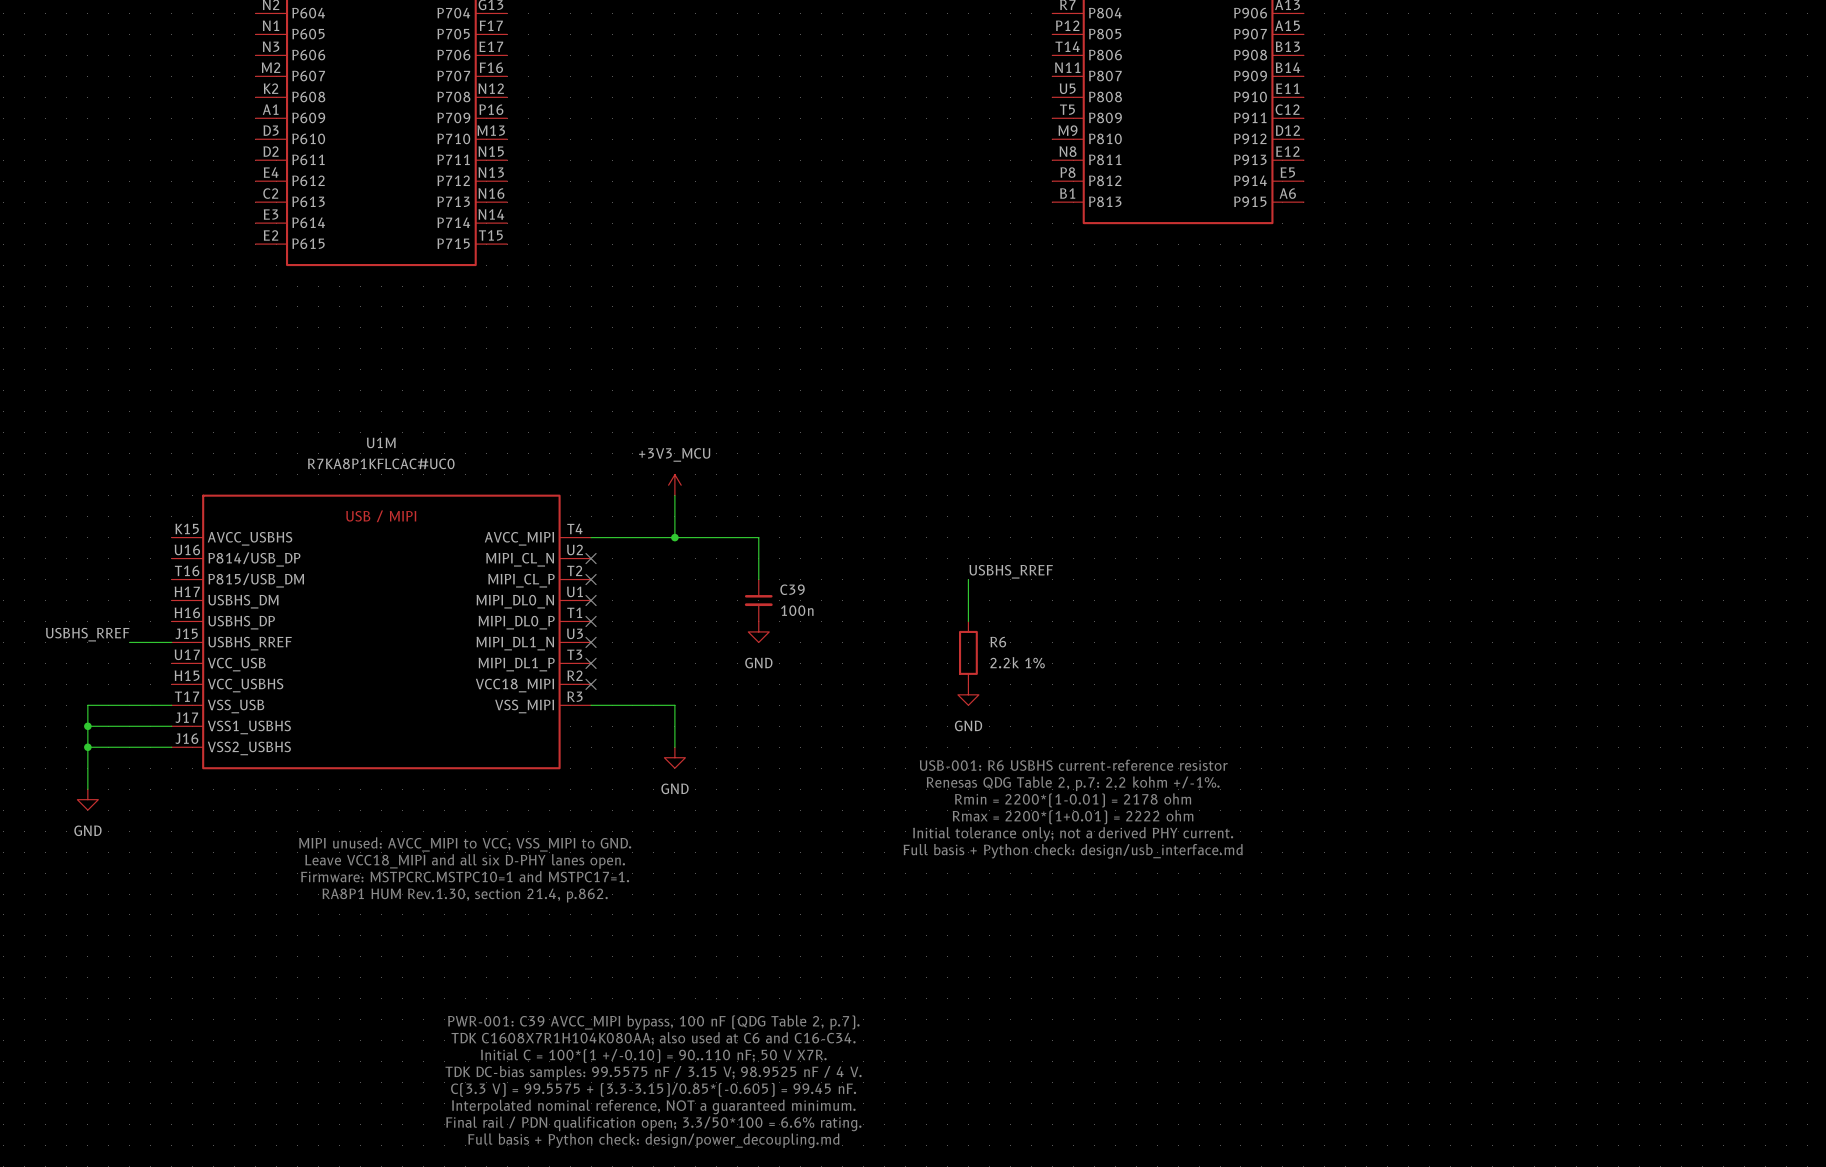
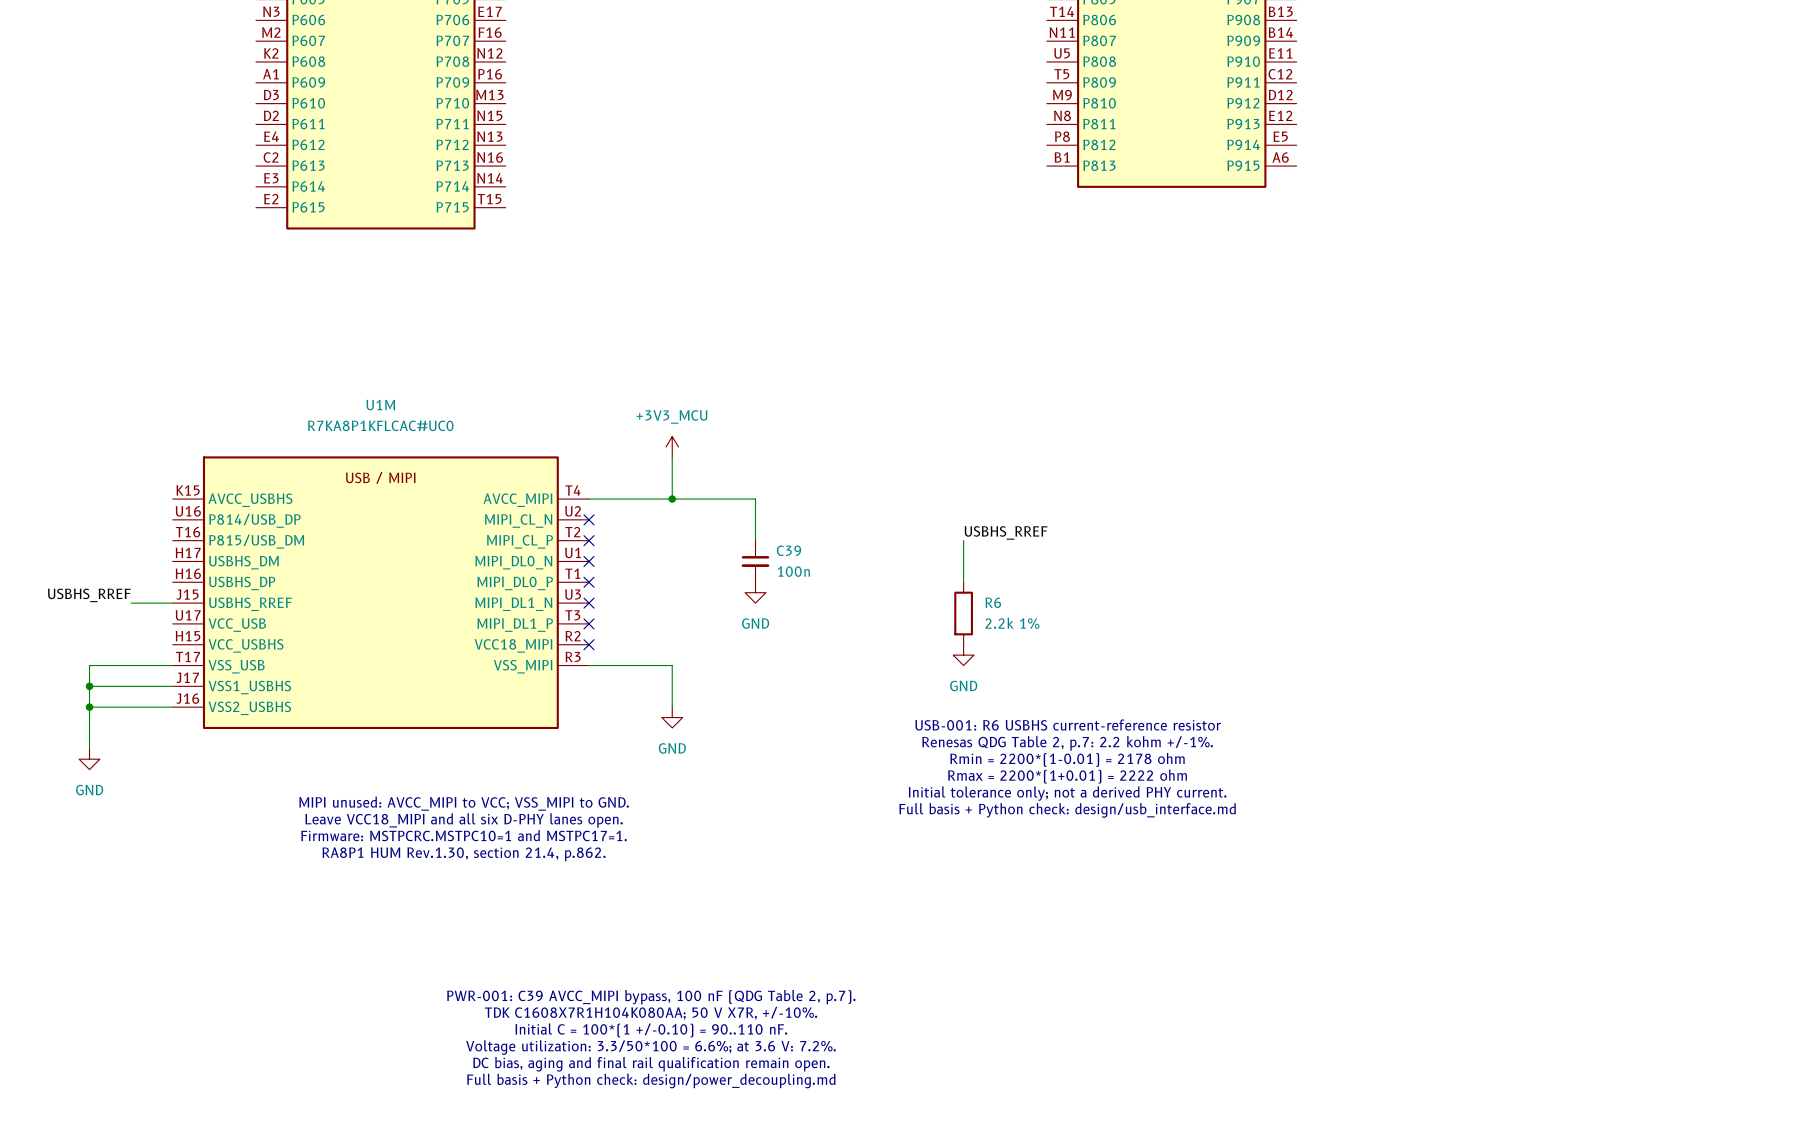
text: PWR-001: C39 AVCC_MIPI bypass, 100 nF (QDG Table 2, p.7). (653, 1022) -> none
text: TDK C1608X7R1H104K080AA; also used at C6 and C16-C34. (653, 1038) -> PWR-001: C39 AVCC_MIPI bypass, 100 nF (QDG Table 2, p.7). (651, 997)
text: Initial C = 100*(1 +/-0.10) = 90..110 nF; 50 V X7R. (653, 1056) -> TDK C1608X7R1H104K080AA; 50 V X7R, +/-10%. (651, 1013)
text: TDK DC-bias samples: 99.5575 nF / 3.15 V; 98.9525 nF / 4 V. (653, 1073) -> Initial C = 100*(1 +/-0.10) = 90..110 nF. (651, 1030)
text: C(3.3 V) = 99.5575 + (3.3-3.15)/0.85*(-0.605) = 99.45 nF. (653, 1089) -> Voltage utilization: 3.3/50*100 = 6.6%; at 3.6 V: 7.2%. (651, 1047)
text: Interpolated nominal reference, NOT a guaranteed minimum. (653, 1107) -> DC bias, aging and final rail qualification remain open. (651, 1064)
text: Final rail / PDN qualification open; 3.3/50*100 = 6.6% rating. (653, 1123) -> Full basis + Python check: design/power_decoupling.md (651, 1081)
text: Full basis + Python check: design/power_decoupling.md (653, 1140) -> none

